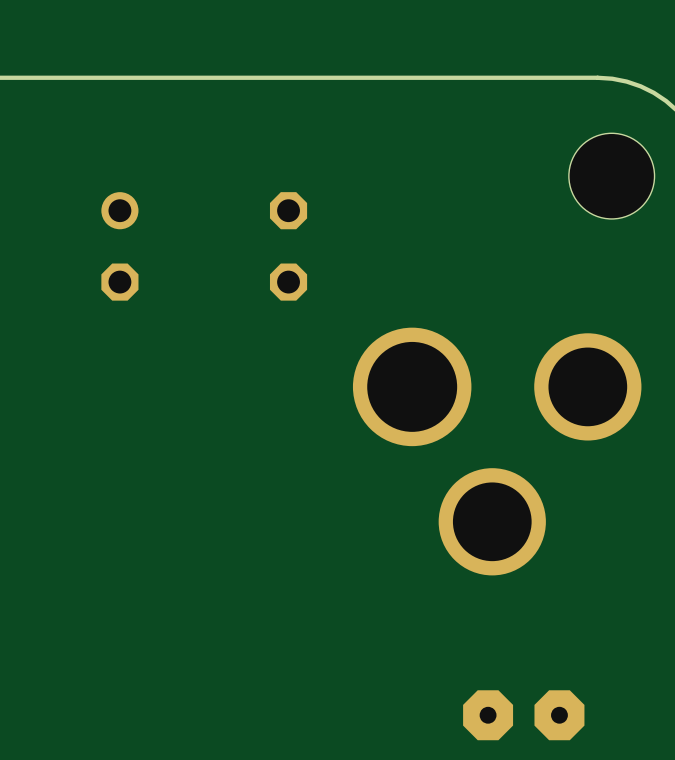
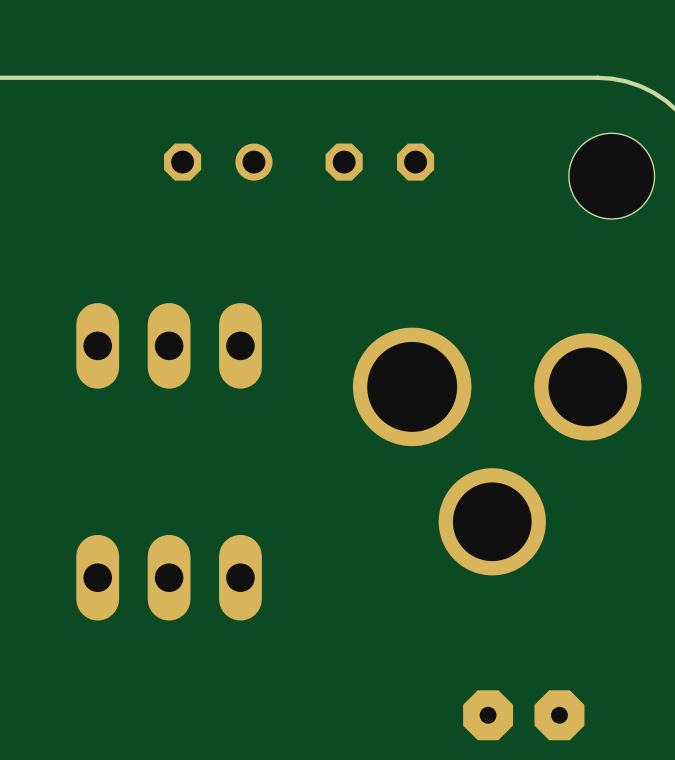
part rotation: 0° (119, 246) -> 90° clockwise (218, 162)
part position: (119, 246) -> (218, 162)
part rotation: 0° (288, 246) -> 90° clockwise (379, 162)
part position: (288, 246) -> (379, 162)
part: none -> (169, 345)
part: none -> (169, 577)

